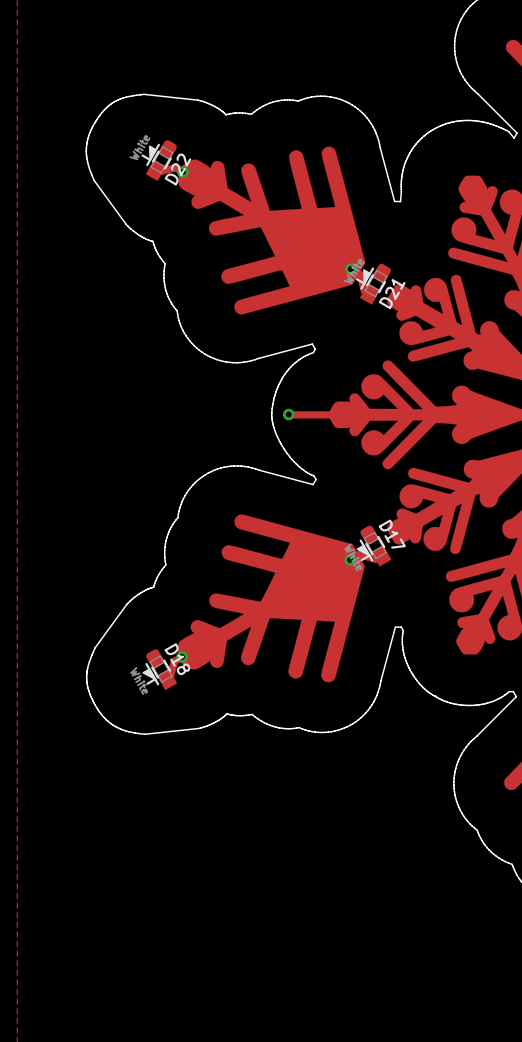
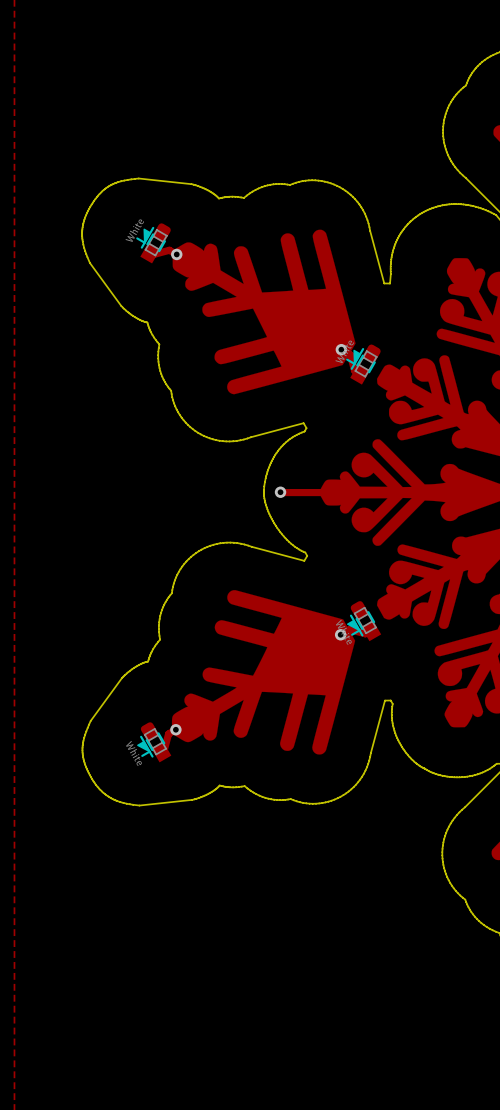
D22 name: D22 (178, 169) -> none
D21 name: D21 (392, 294) -> none
D17 name: D17 (392, 534) -> none
D18 name: D18 (177, 659) -> none

